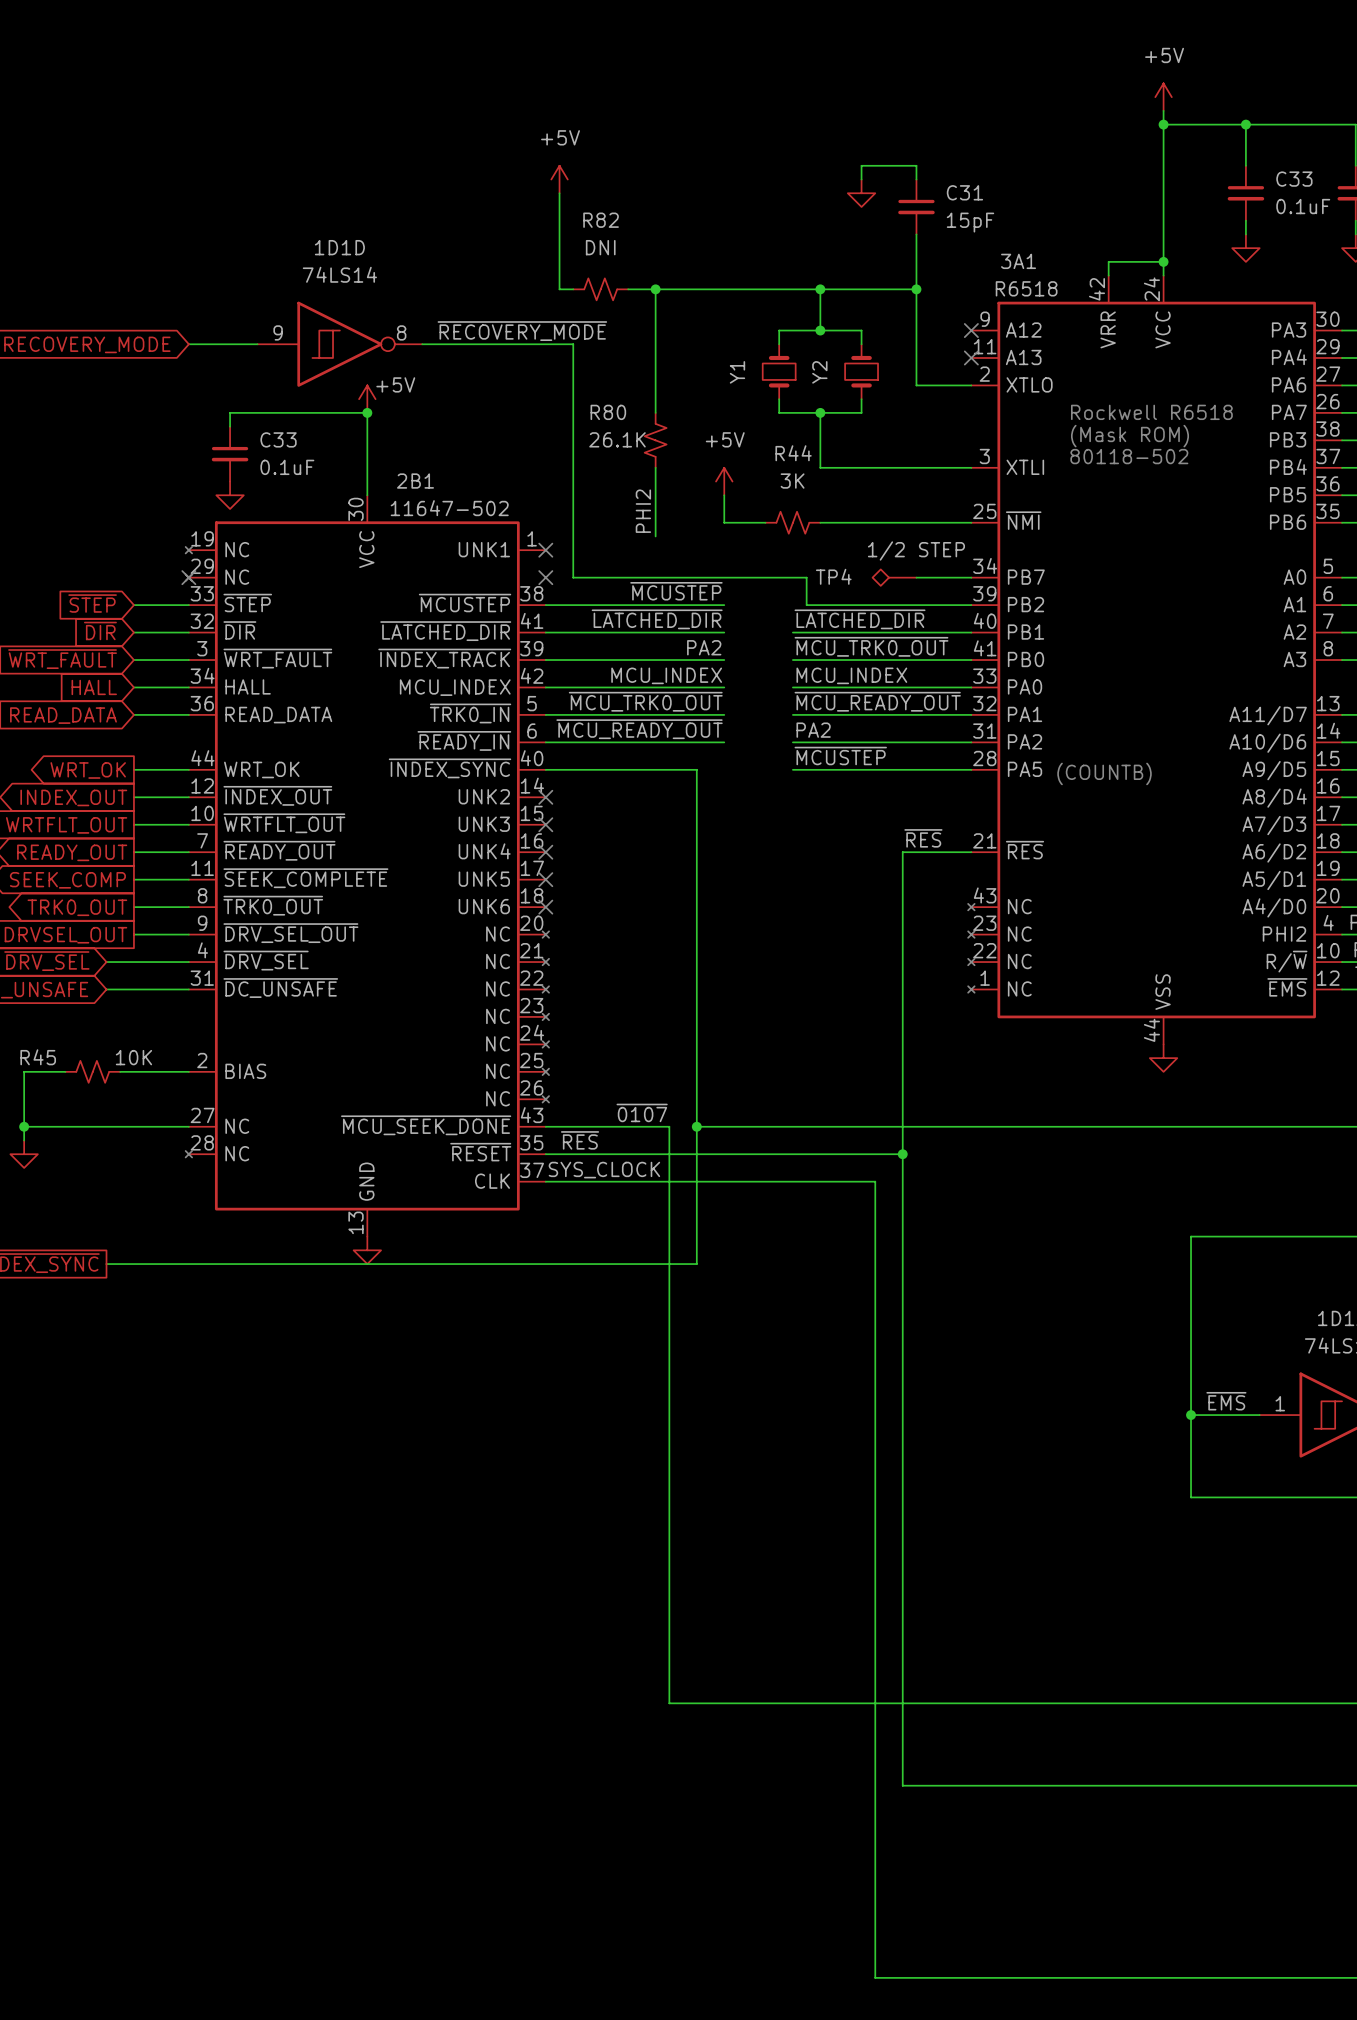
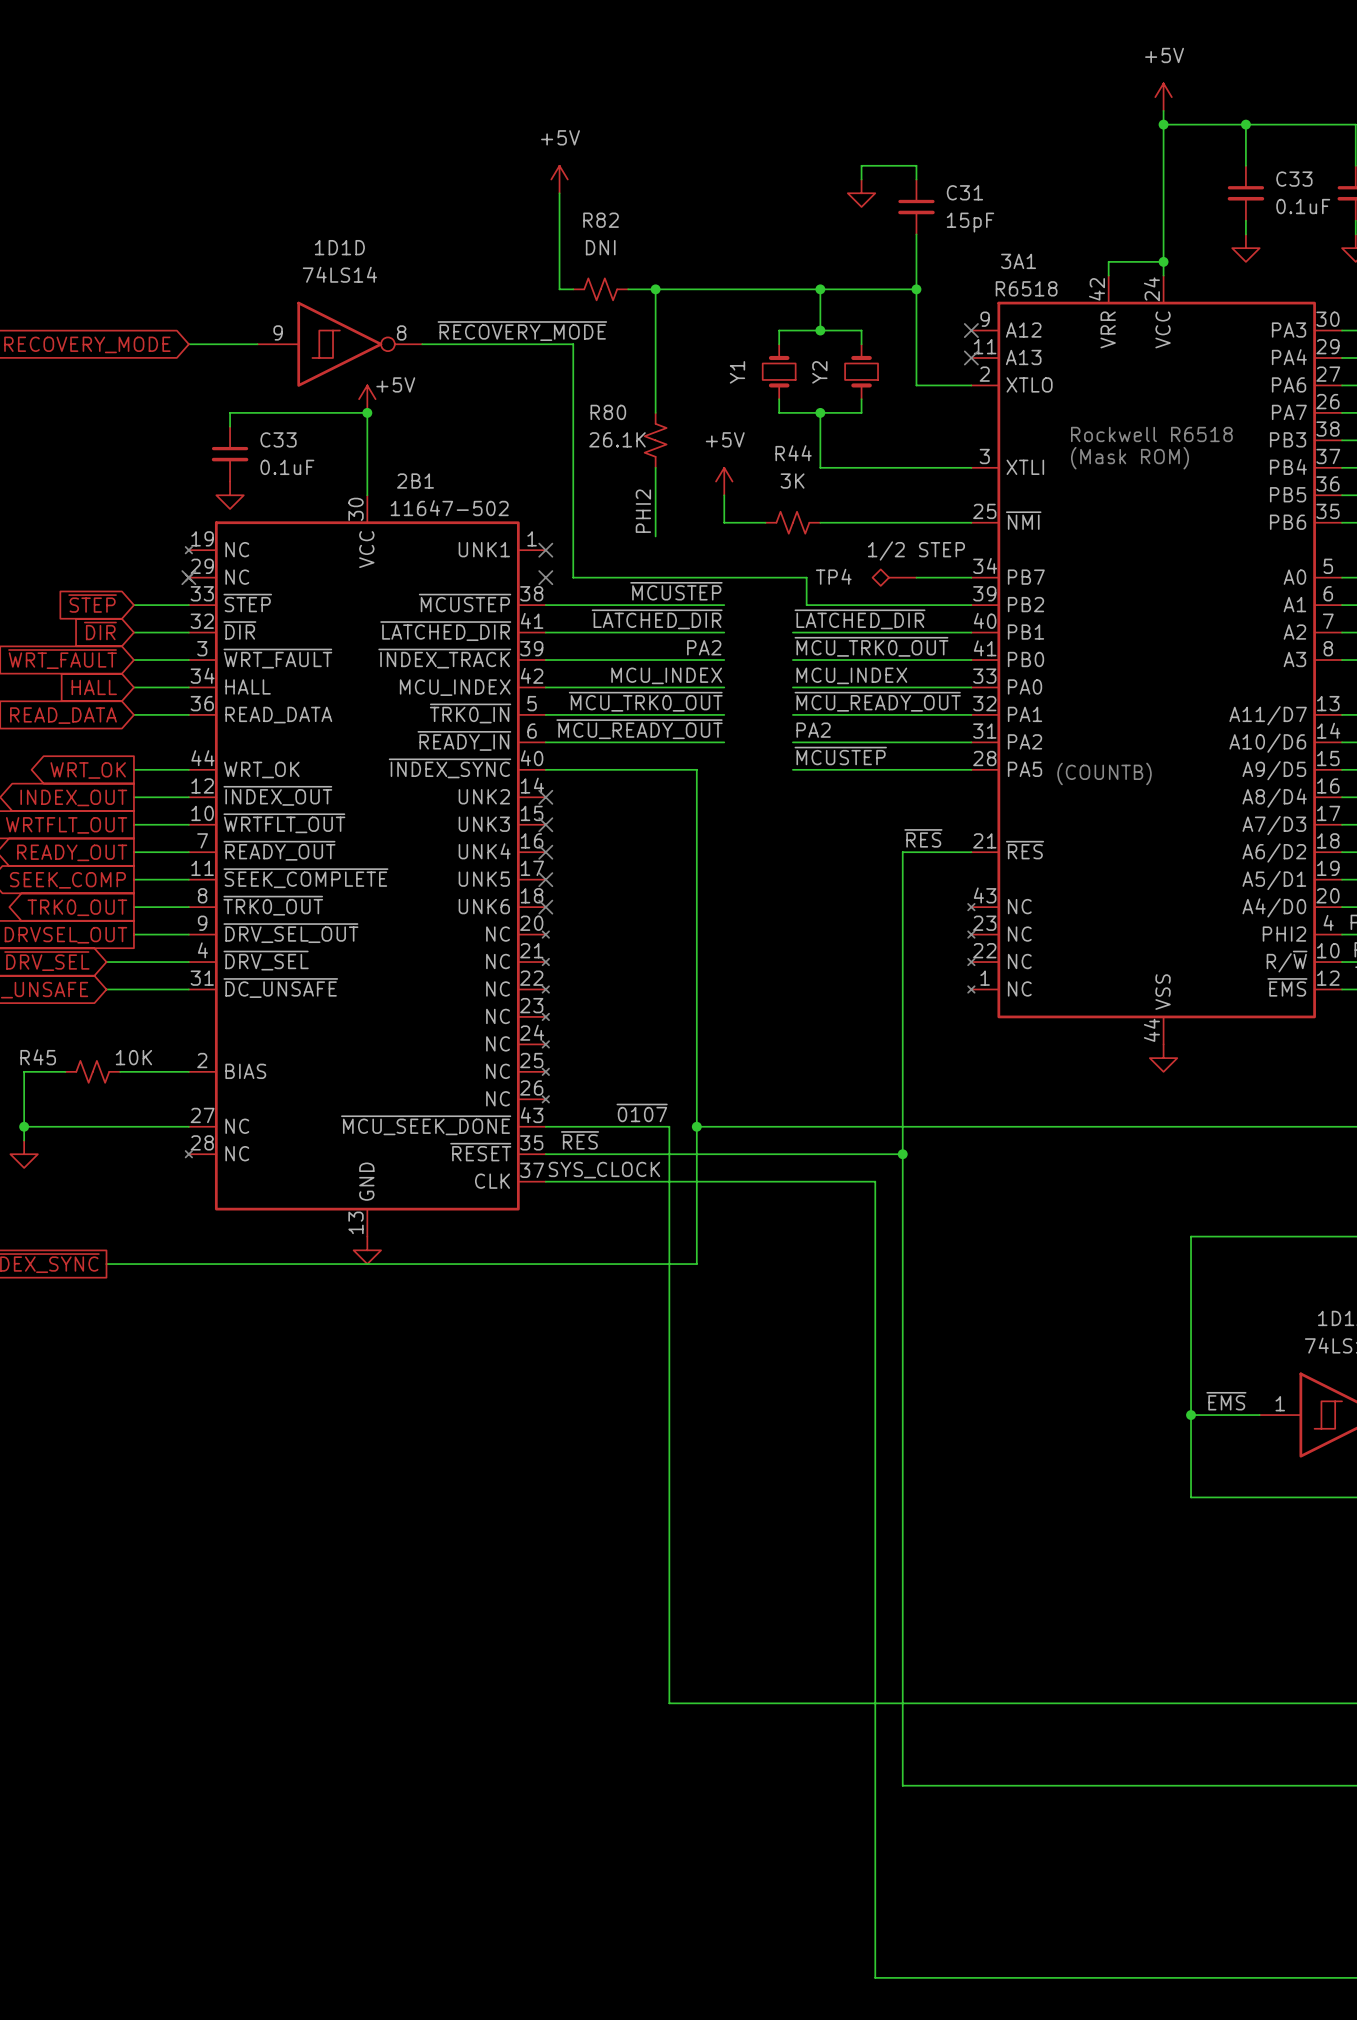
text: Rockwell R6518 (1151, 412) -> none
text: (Mask ROM) (1130, 436) -> Rockwell R6518 (1151, 434)
text: 80118-502 (1129, 456) -> (Mask ROM) (1130, 458)

